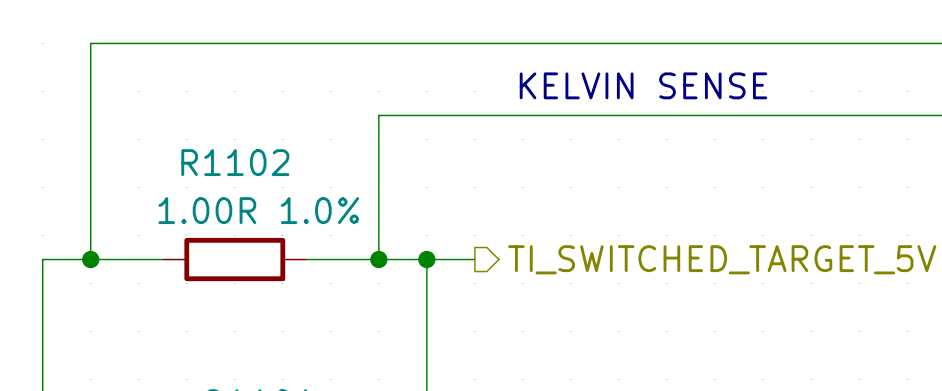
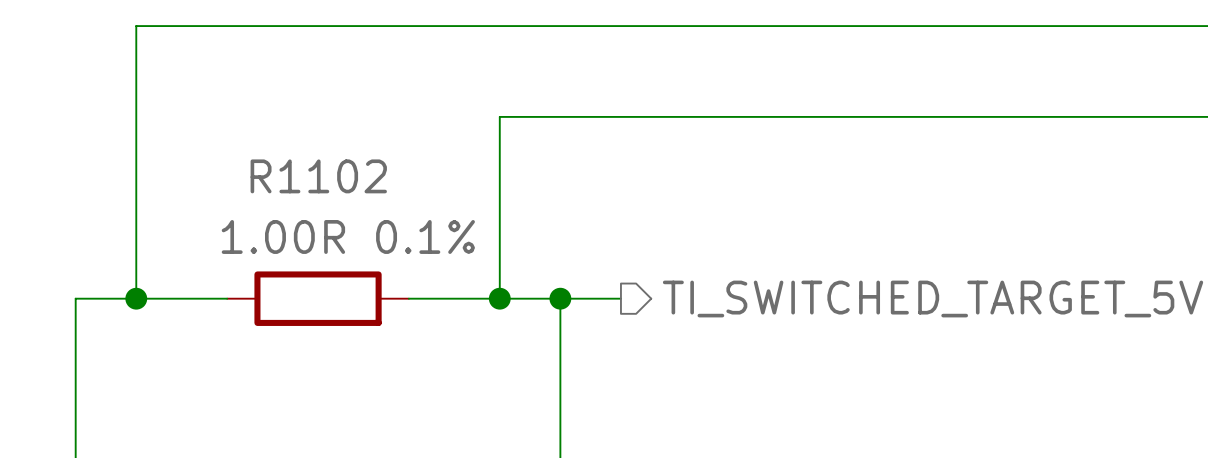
text: KELVIN SENSE (643, 85) -> none
R1102 value: 1.00R 1.0% (258, 210) -> 1.00R 0.1% (348, 236)

